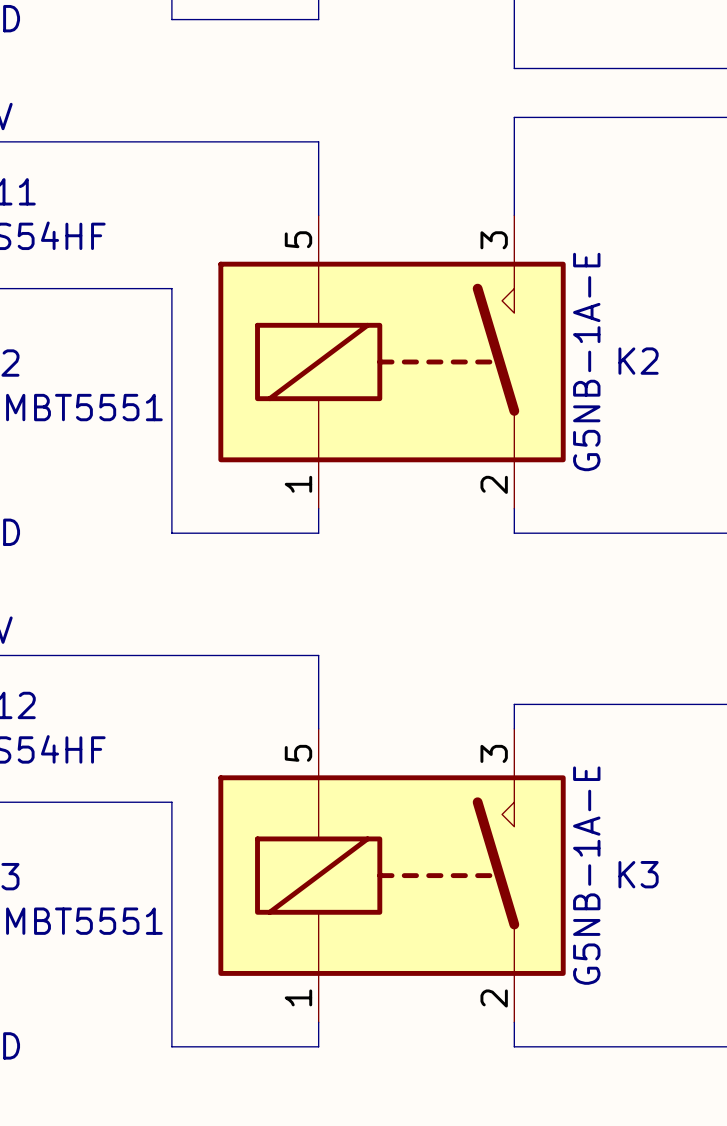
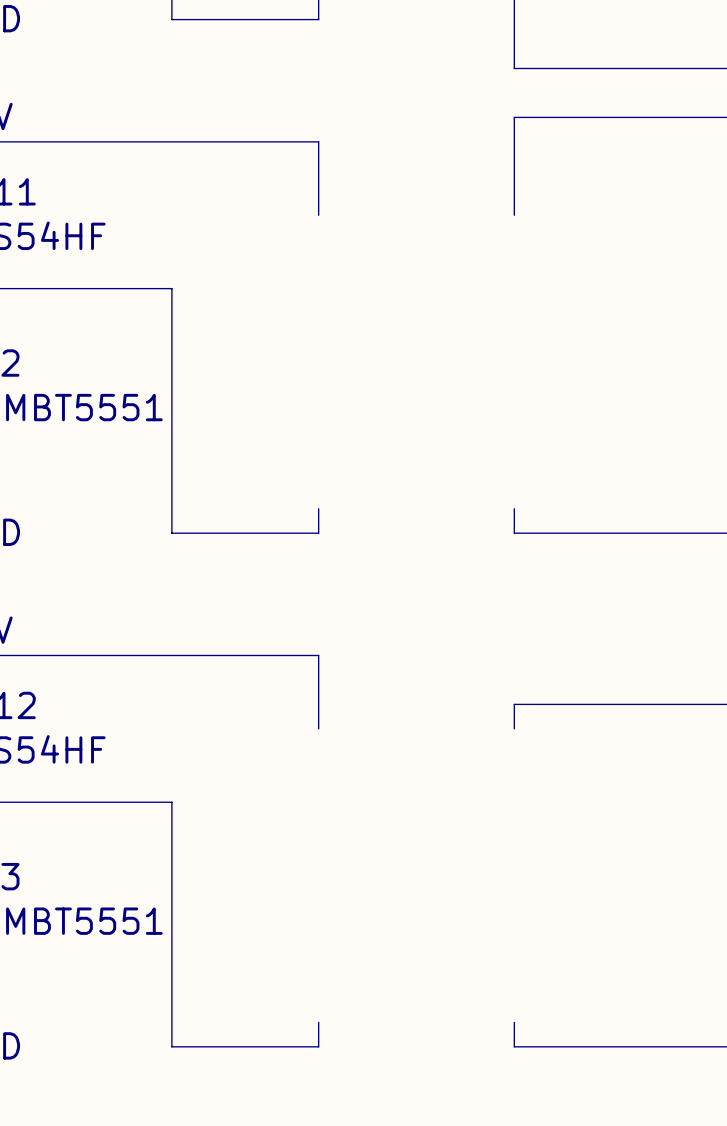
K2: G5NB-1A-E (392, 361) -> none
K3: G5NB-1A-E (392, 875) -> none

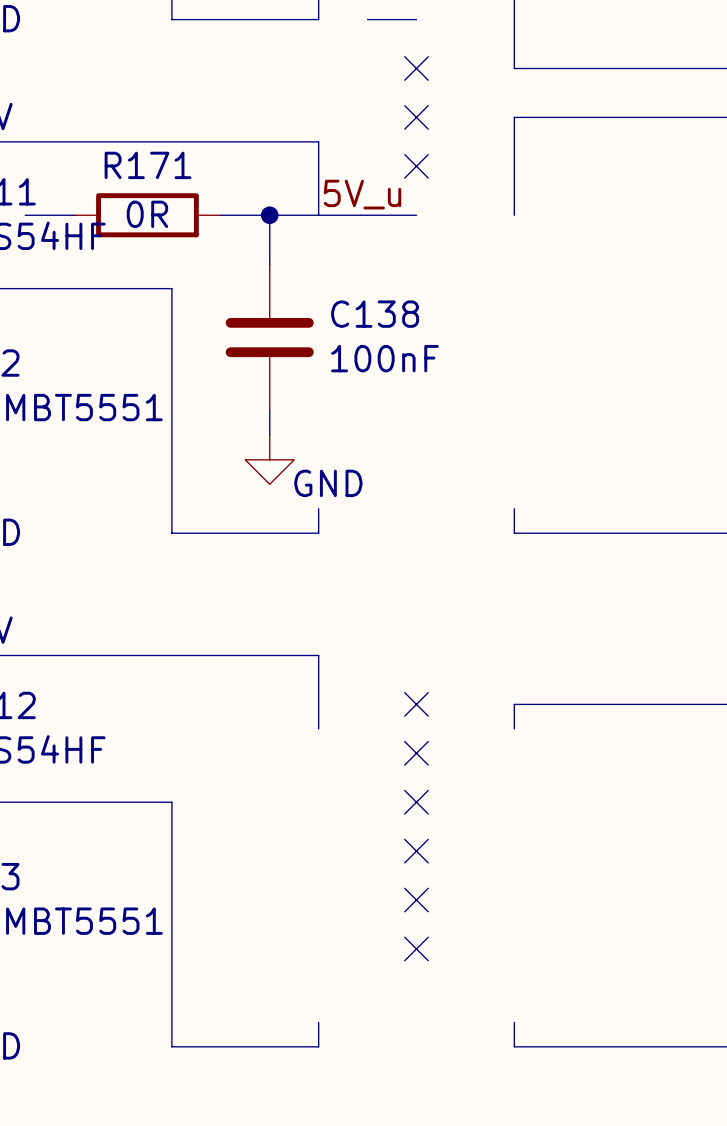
wire: none -> (367, 19) (416, 19)
no-connect mark: none -> (416, 68)
no-connect mark: none -> (416, 117)
no-connect mark: none -> (416, 166)
label: none -> 5V_u (362, 194)
wire: none -> (25, 215) (74, 215)
R171: none -> 0R (147, 215)
wire: none -> (220, 215) (416, 215)
wire: none -> (269, 215) (269, 264)
junction: none -> (269, 215)
C138: none -> 100nF (269, 337)
wire: none -> (269, 410) (269, 435)
power symbol: none -> GND (269, 459)
no-connect mark: none -> (416, 704)
no-connect mark: none -> (416, 753)
no-connect mark: none -> (416, 802)
no-connect mark: none -> (416, 851)
no-connect mark: none -> (416, 900)
no-connect mark: none -> (416, 948)

